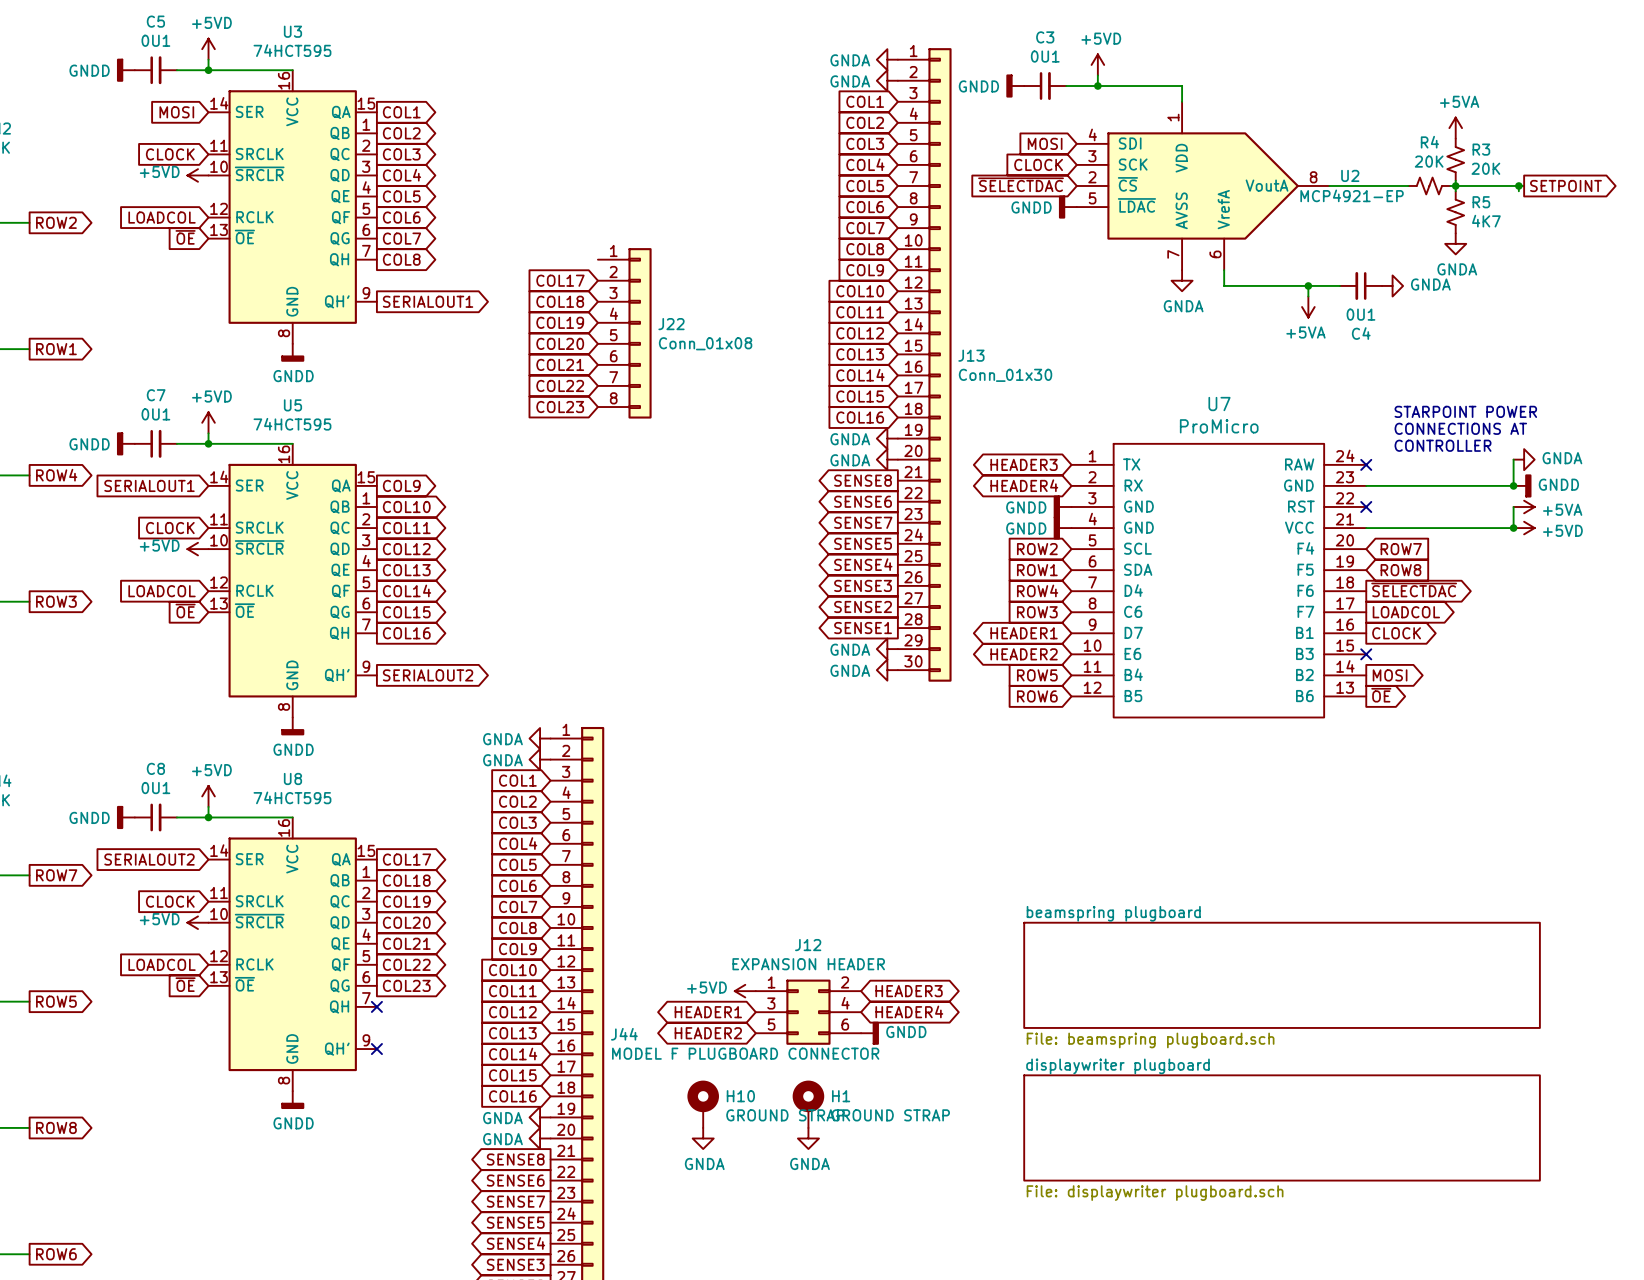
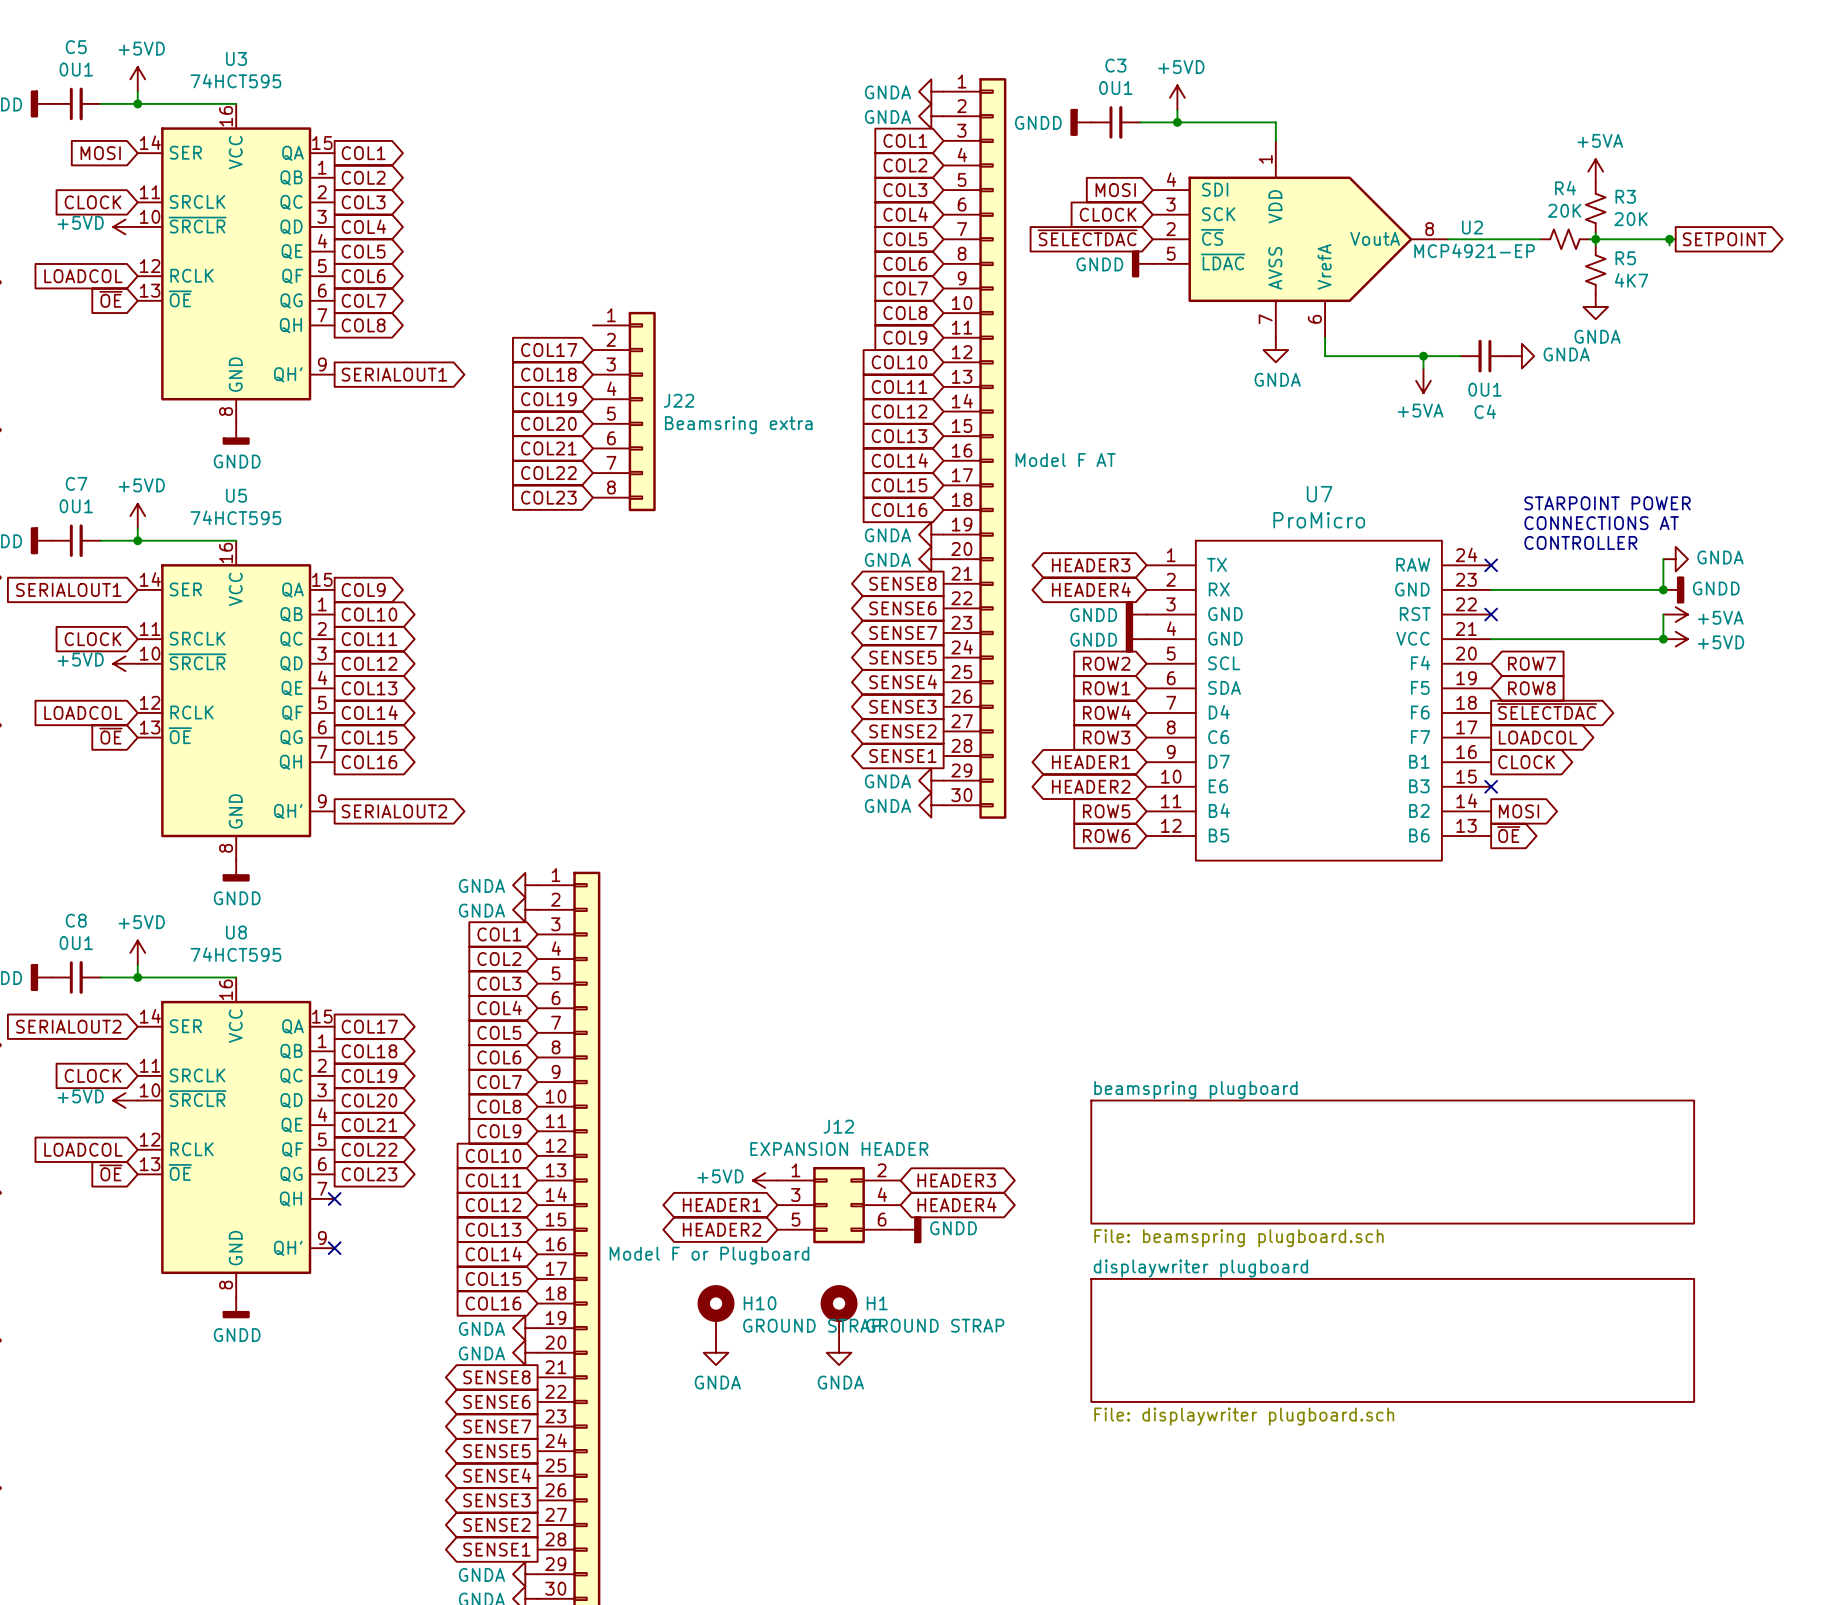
J22 value: Conn_01x08 (705, 343) -> Beamsring extra (738, 425)
J13 name: J13 (971, 355) -> none
J13 value: Conn_01x30 (1005, 375) -> Model F AT (1065, 460)
J44 name: J44 (624, 1034) -> none
J44 value: MODEL F PLUGBOARD CONNECTOR (745, 1053) -> Model F or Plugboard (709, 1255)

